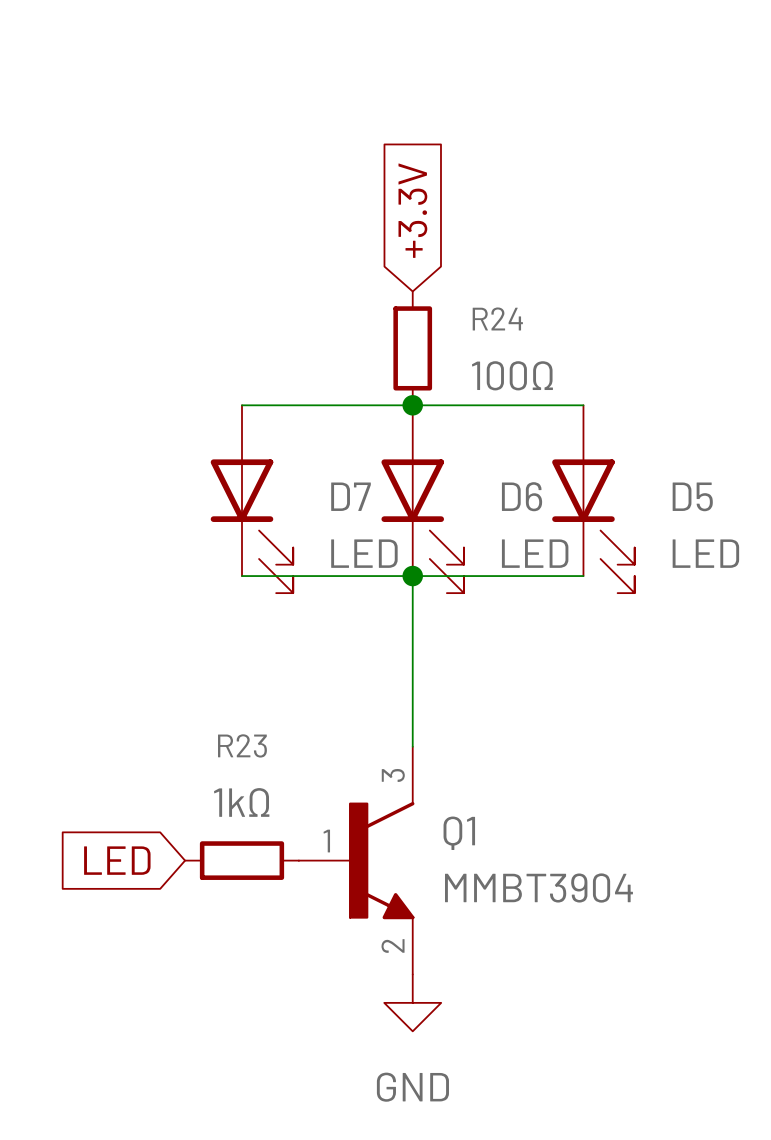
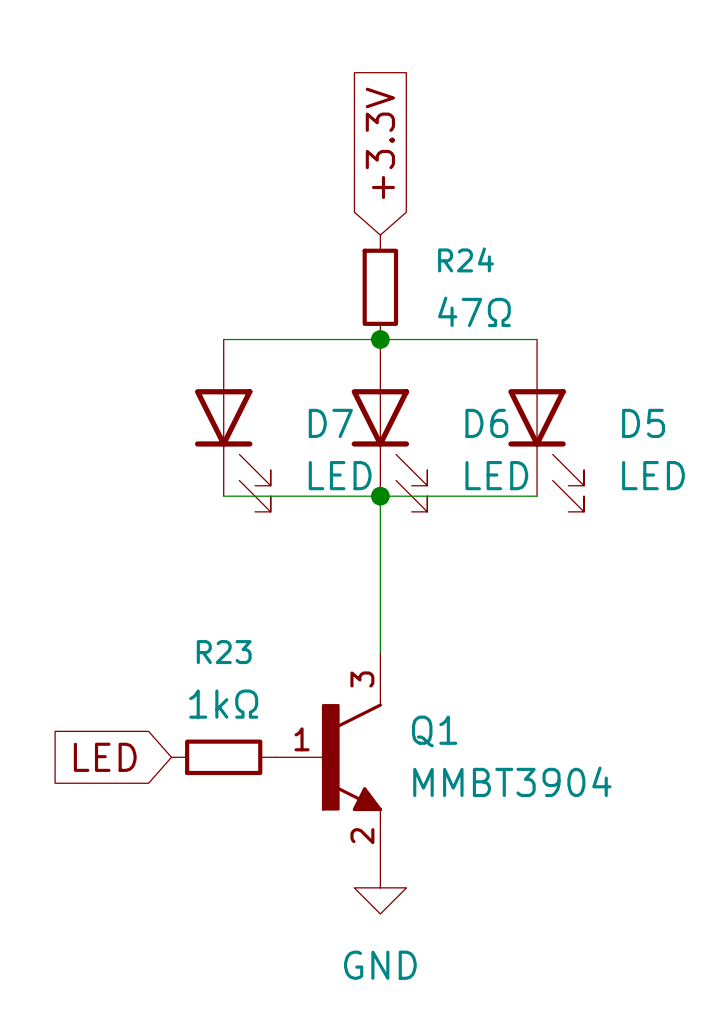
R24 value: 100Ω (512, 375) -> 47Ω (474, 311)

